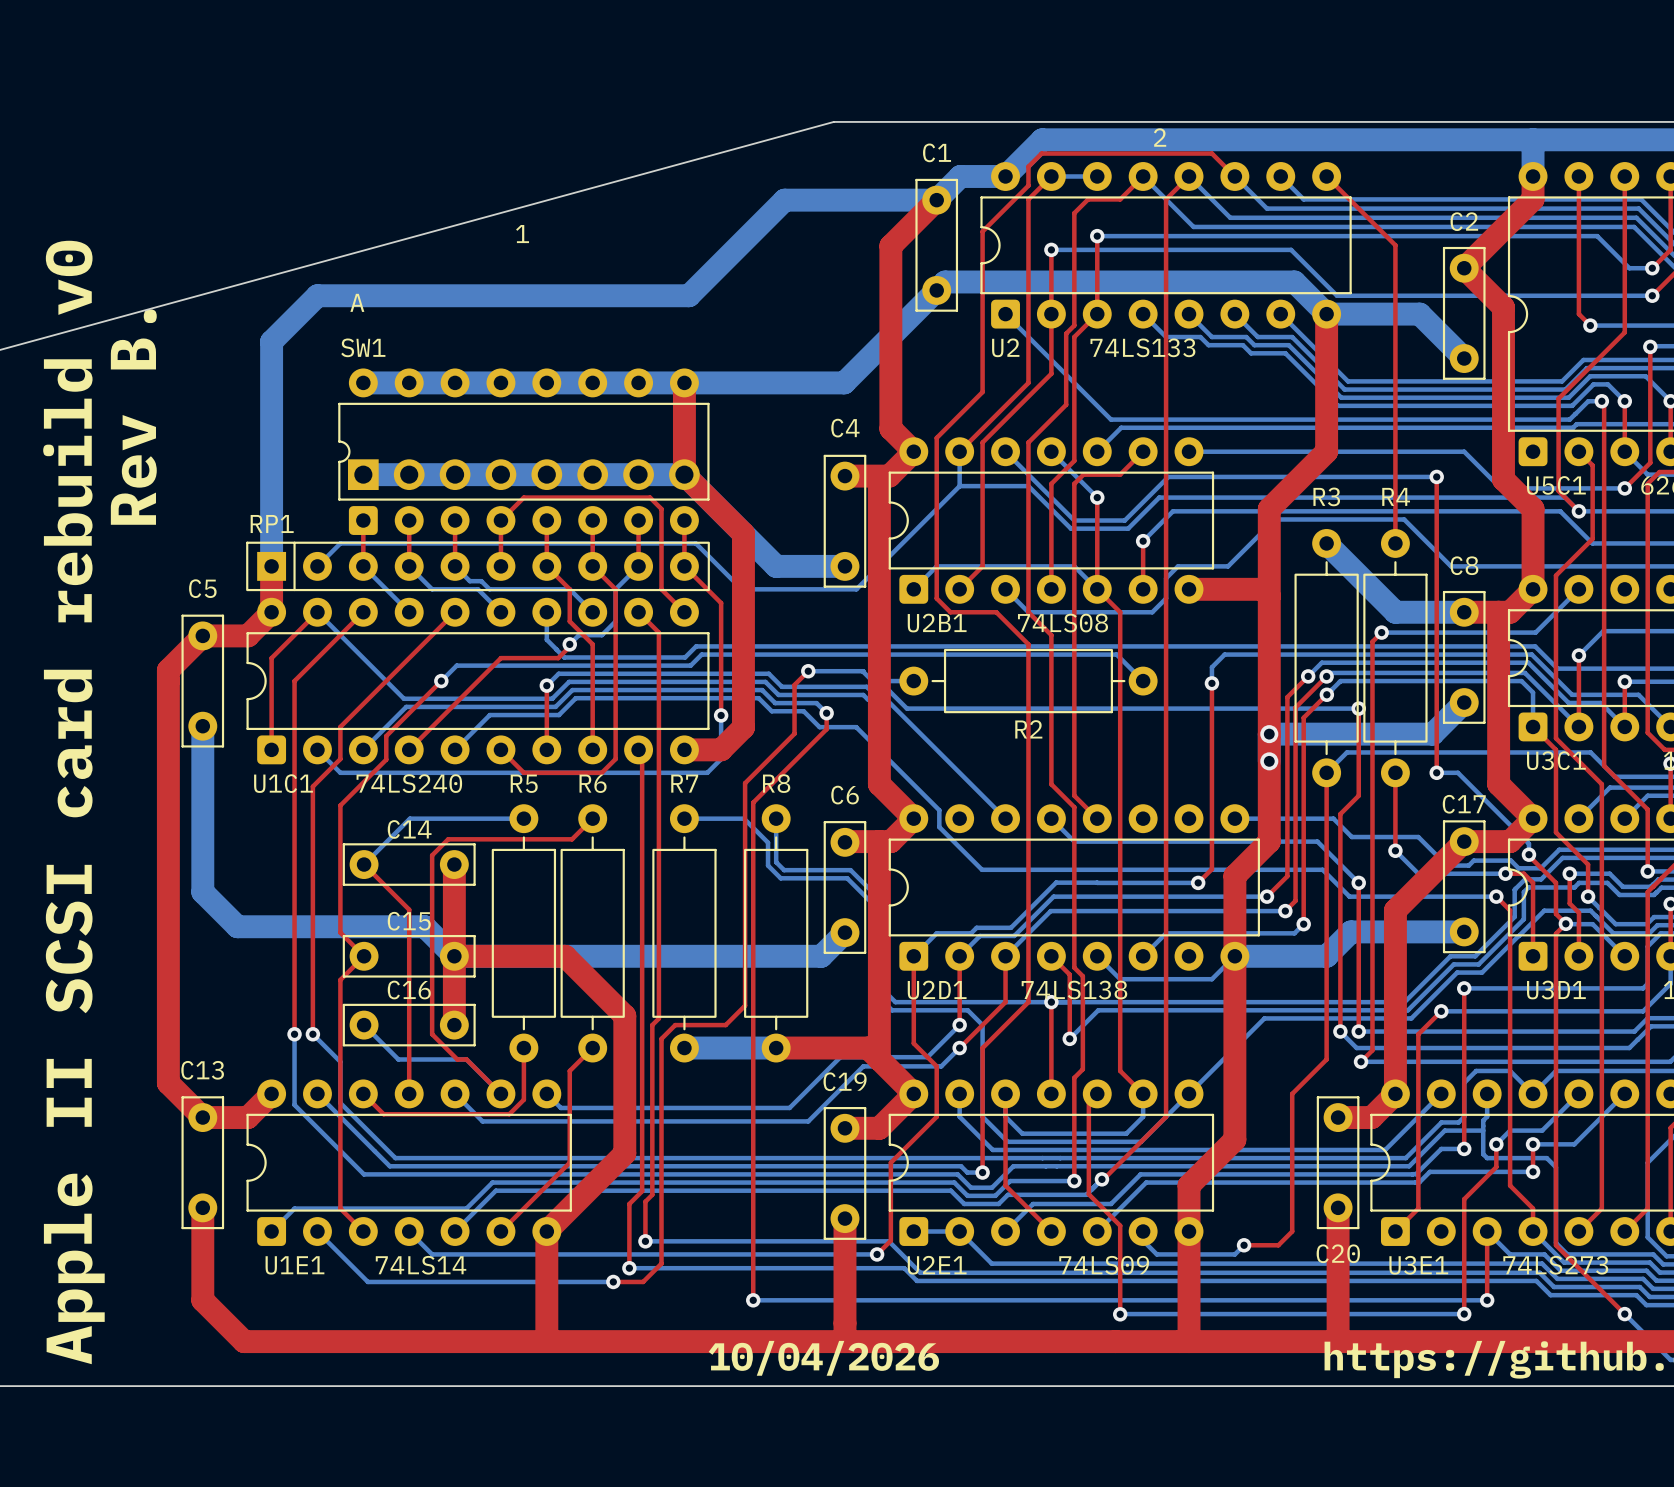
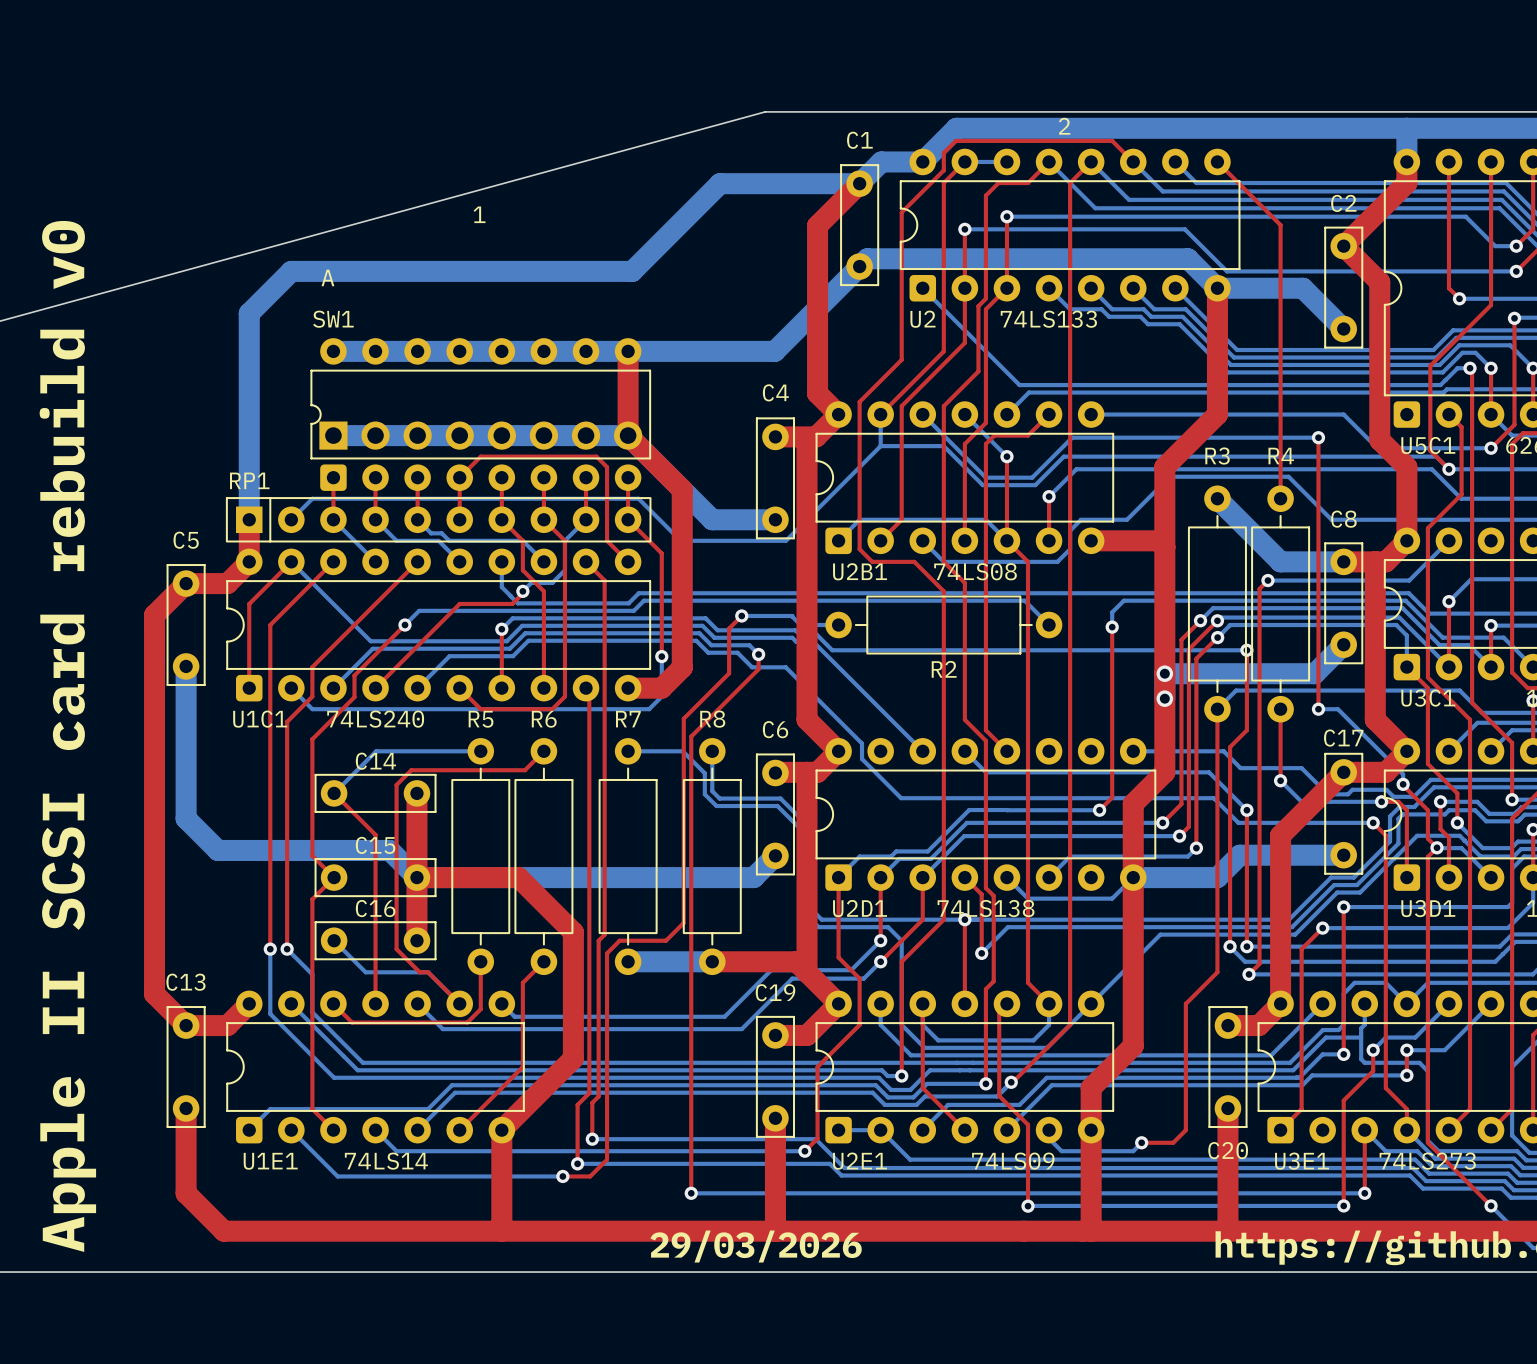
text: Rev B. (133, 417) -> none
text: 10/04/2026 (823, 1358) -> 29/03/2026 (756, 1246)

